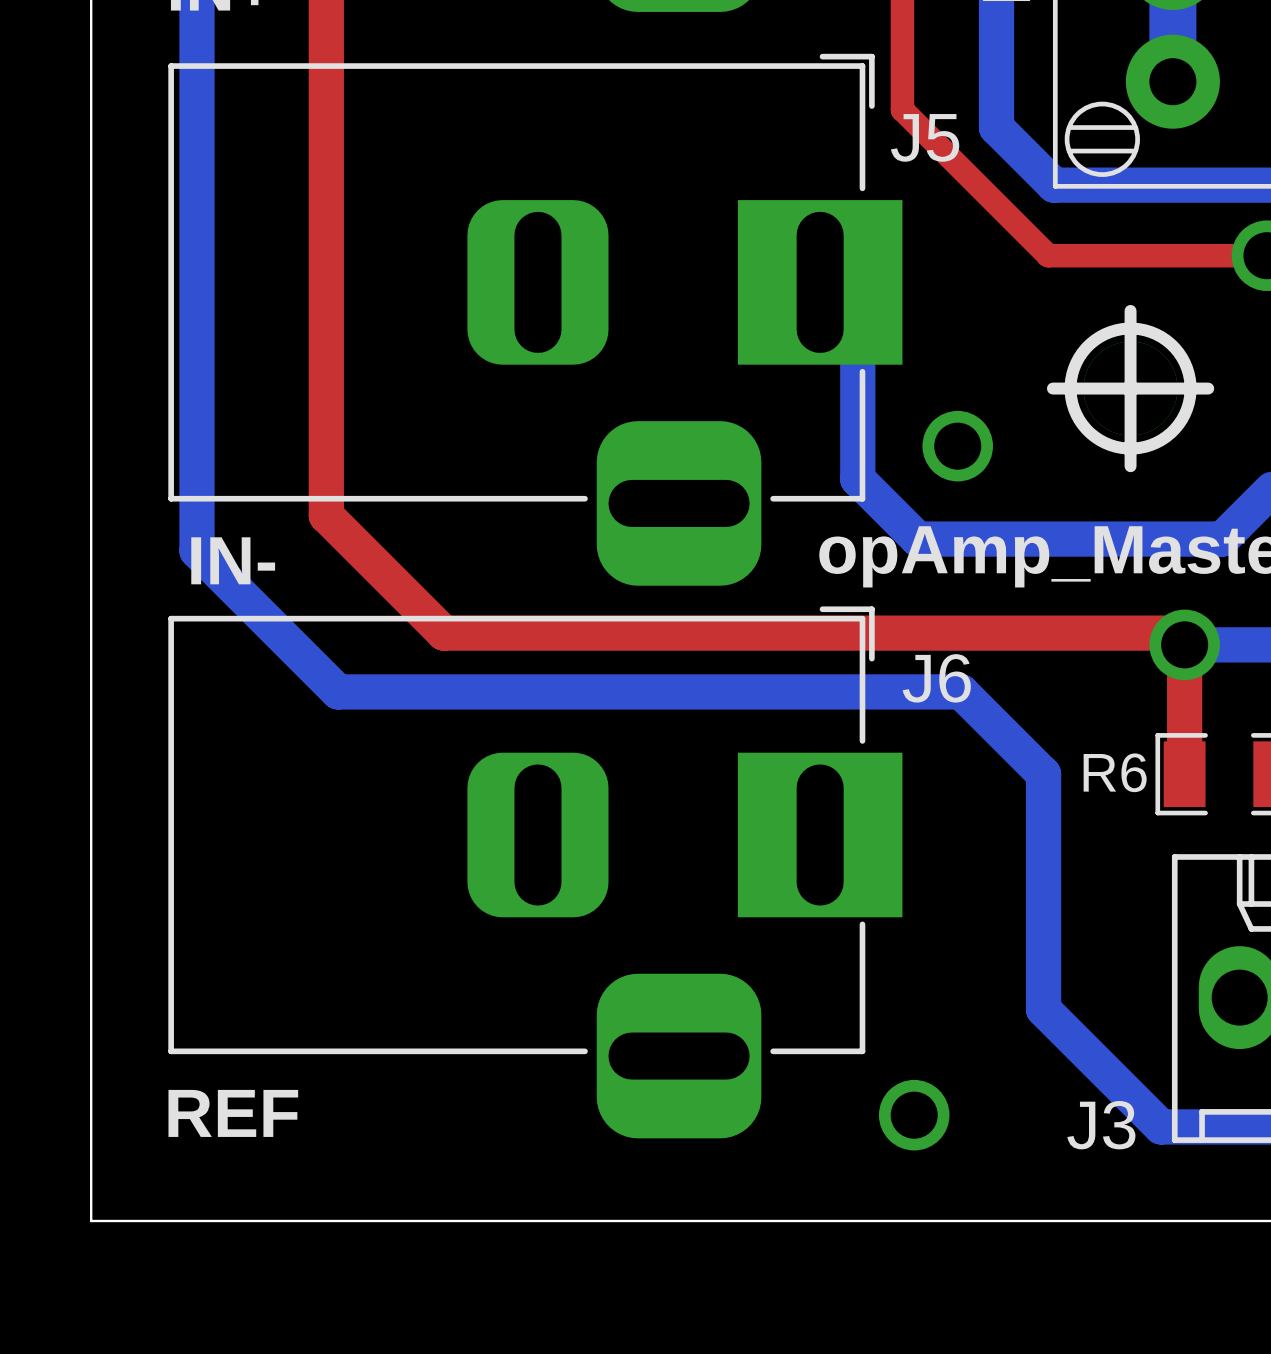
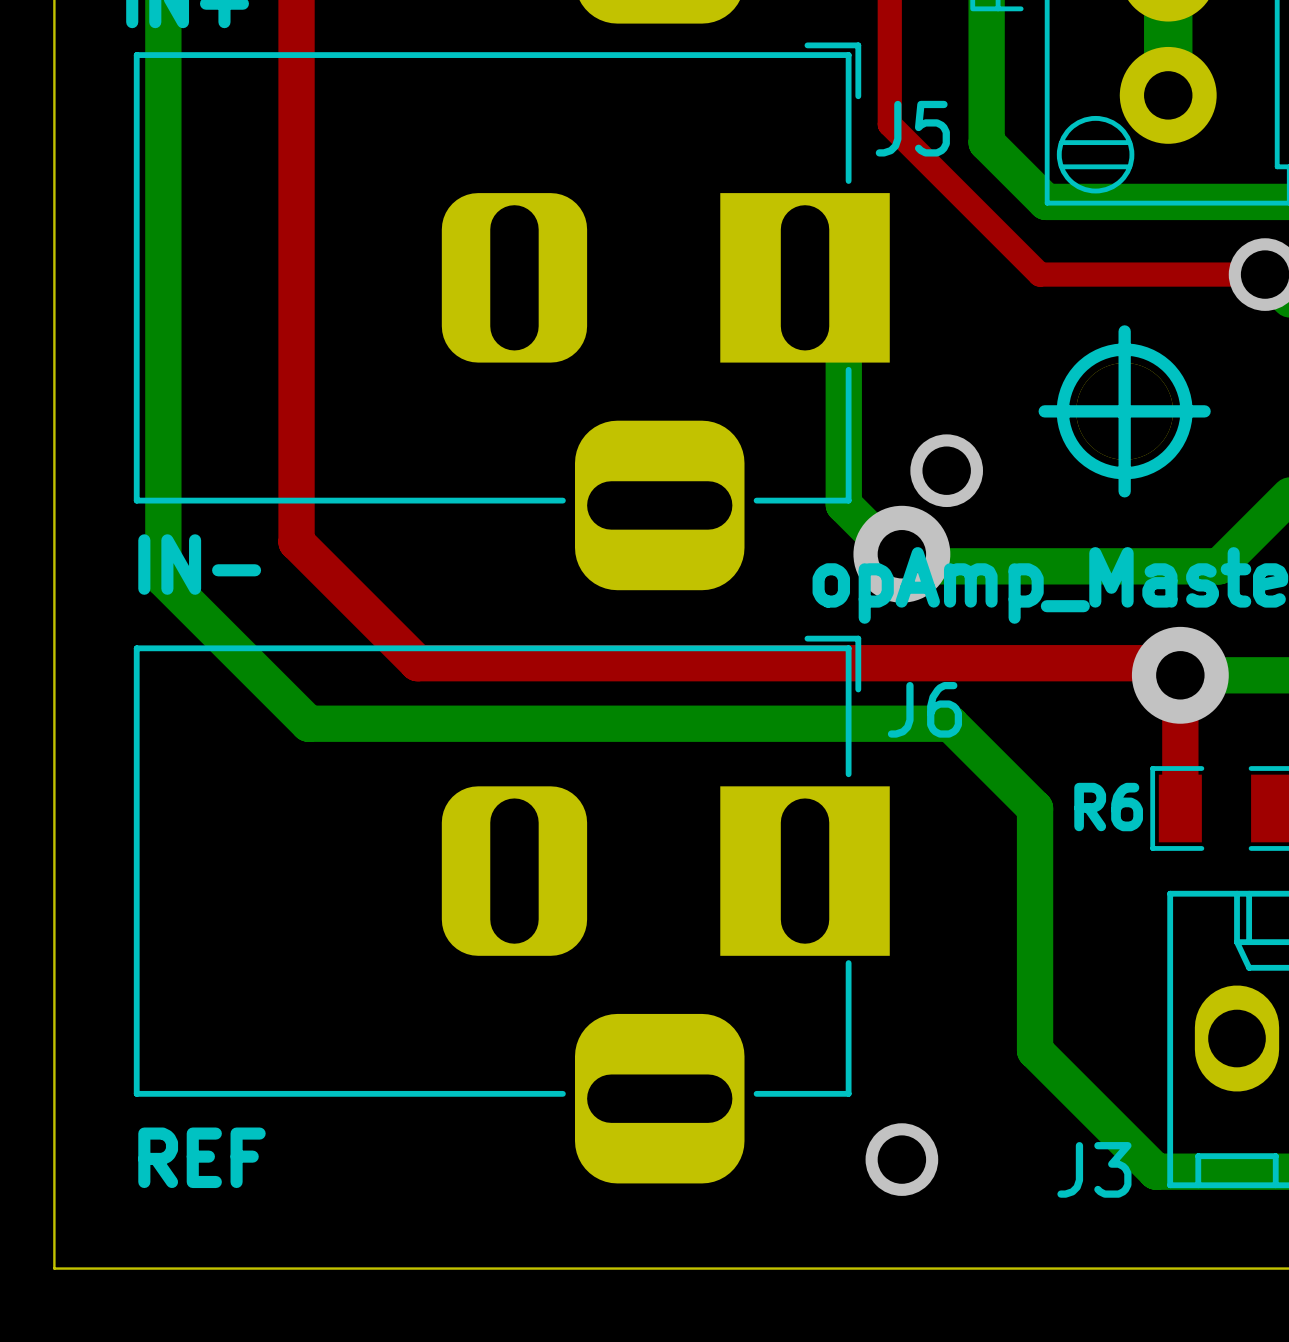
J5 position: (535, 319) -> (511, 316)
via: none -> (901, 554)
via size: [1149, 609, 1220, 681] -> [1131, 626, 1229, 724]

